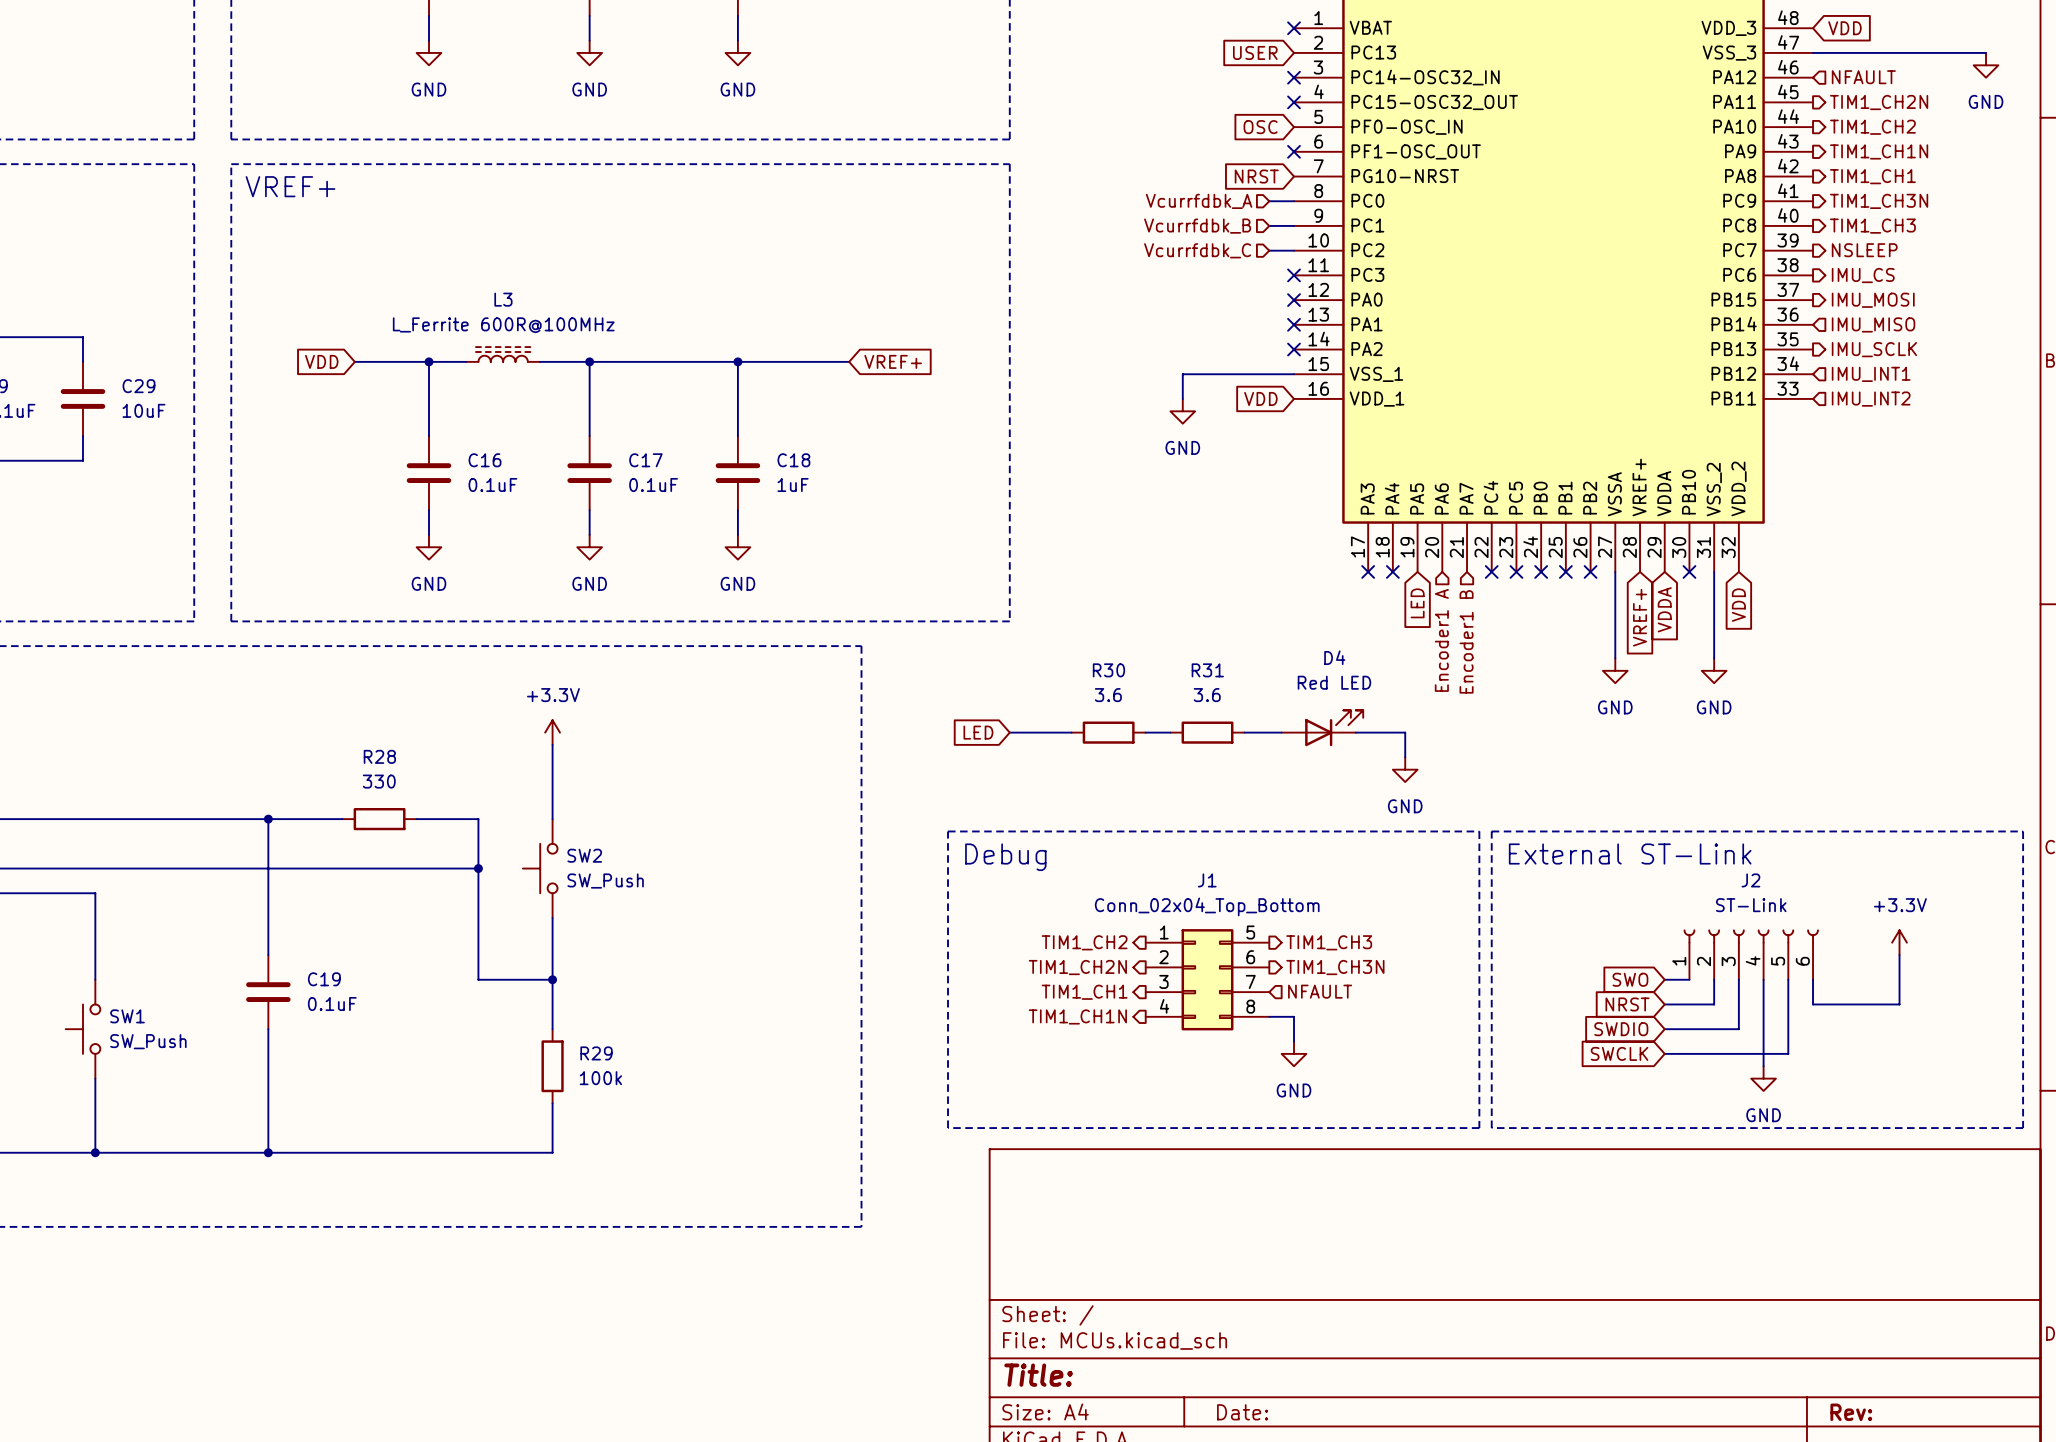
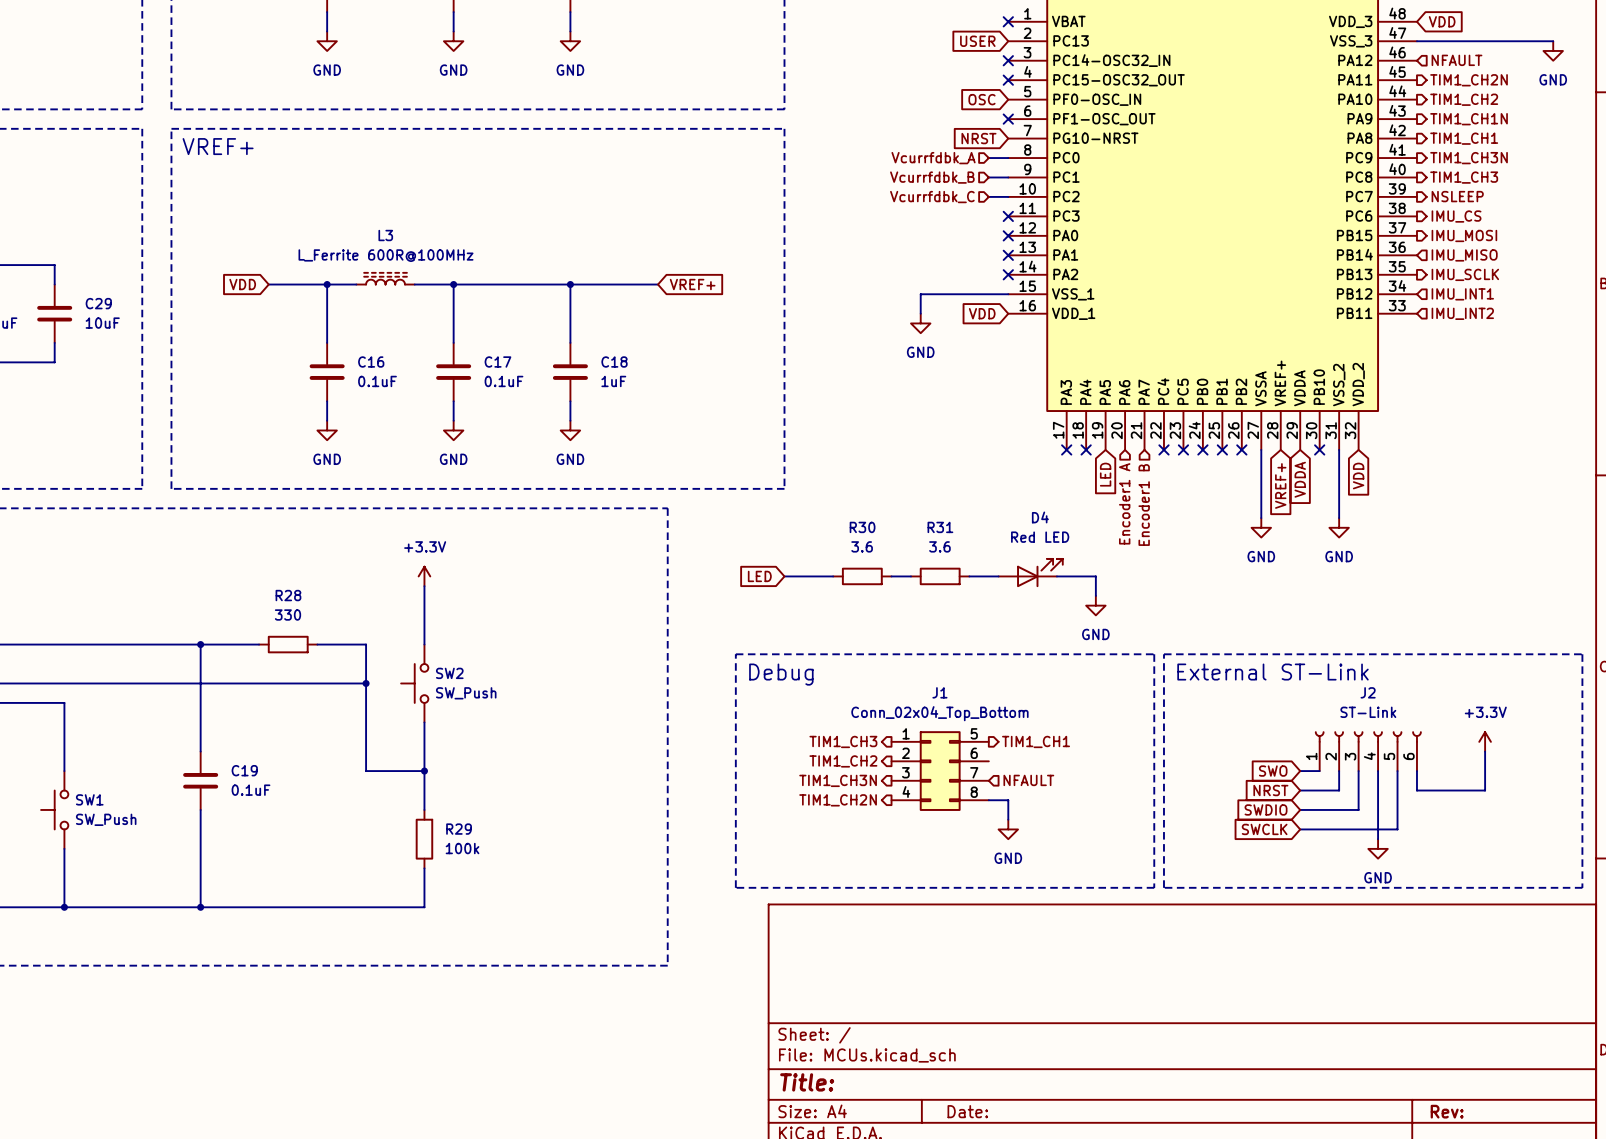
hierarchical label: TIM1_CH2 (1084, 942) -> TIM1_CH3 (843, 741)
hierarchical label: TIM1_CH3 (1329, 942) -> TIM1_CH1 (1036, 741)
hierarchical label: TIM1_CH2N (1077, 967) -> TIM1_CH2 (843, 761)
hierarchical label: TIM1_CH3N (1335, 967) -> none
hierarchical label: TIM1_CH1 (1084, 992) -> TIM1_CH3N (838, 780)
hierarchical label: TIM1_CH1N (1077, 1016) -> TIM1_CH2N (838, 800)

